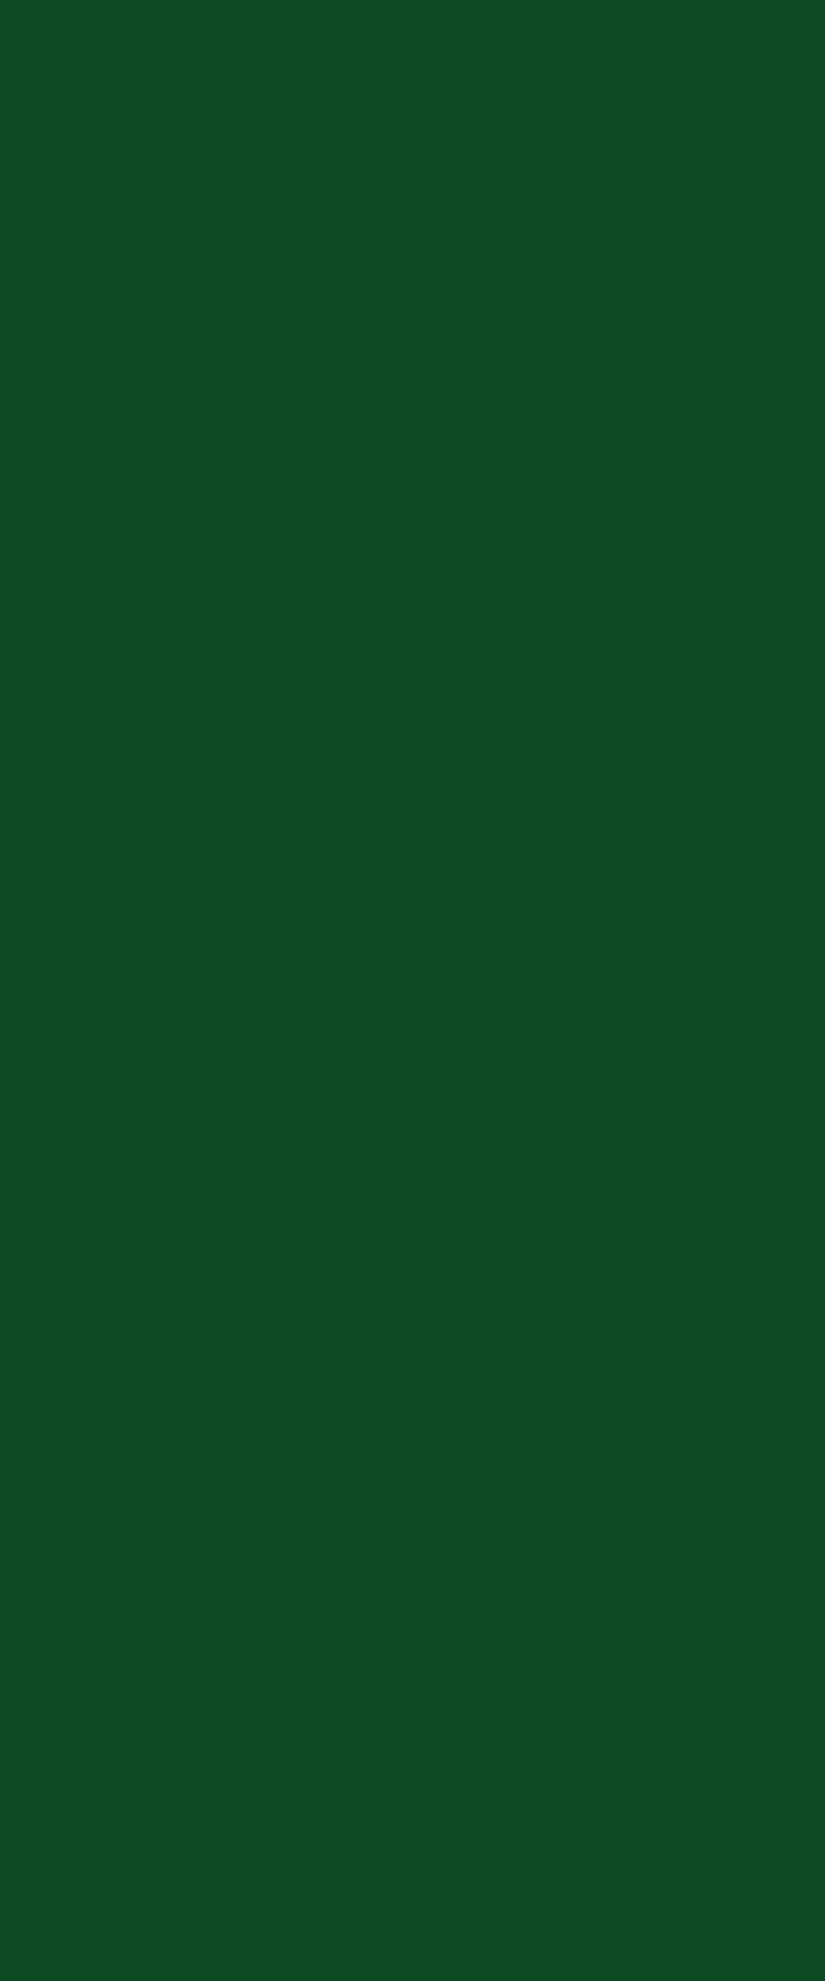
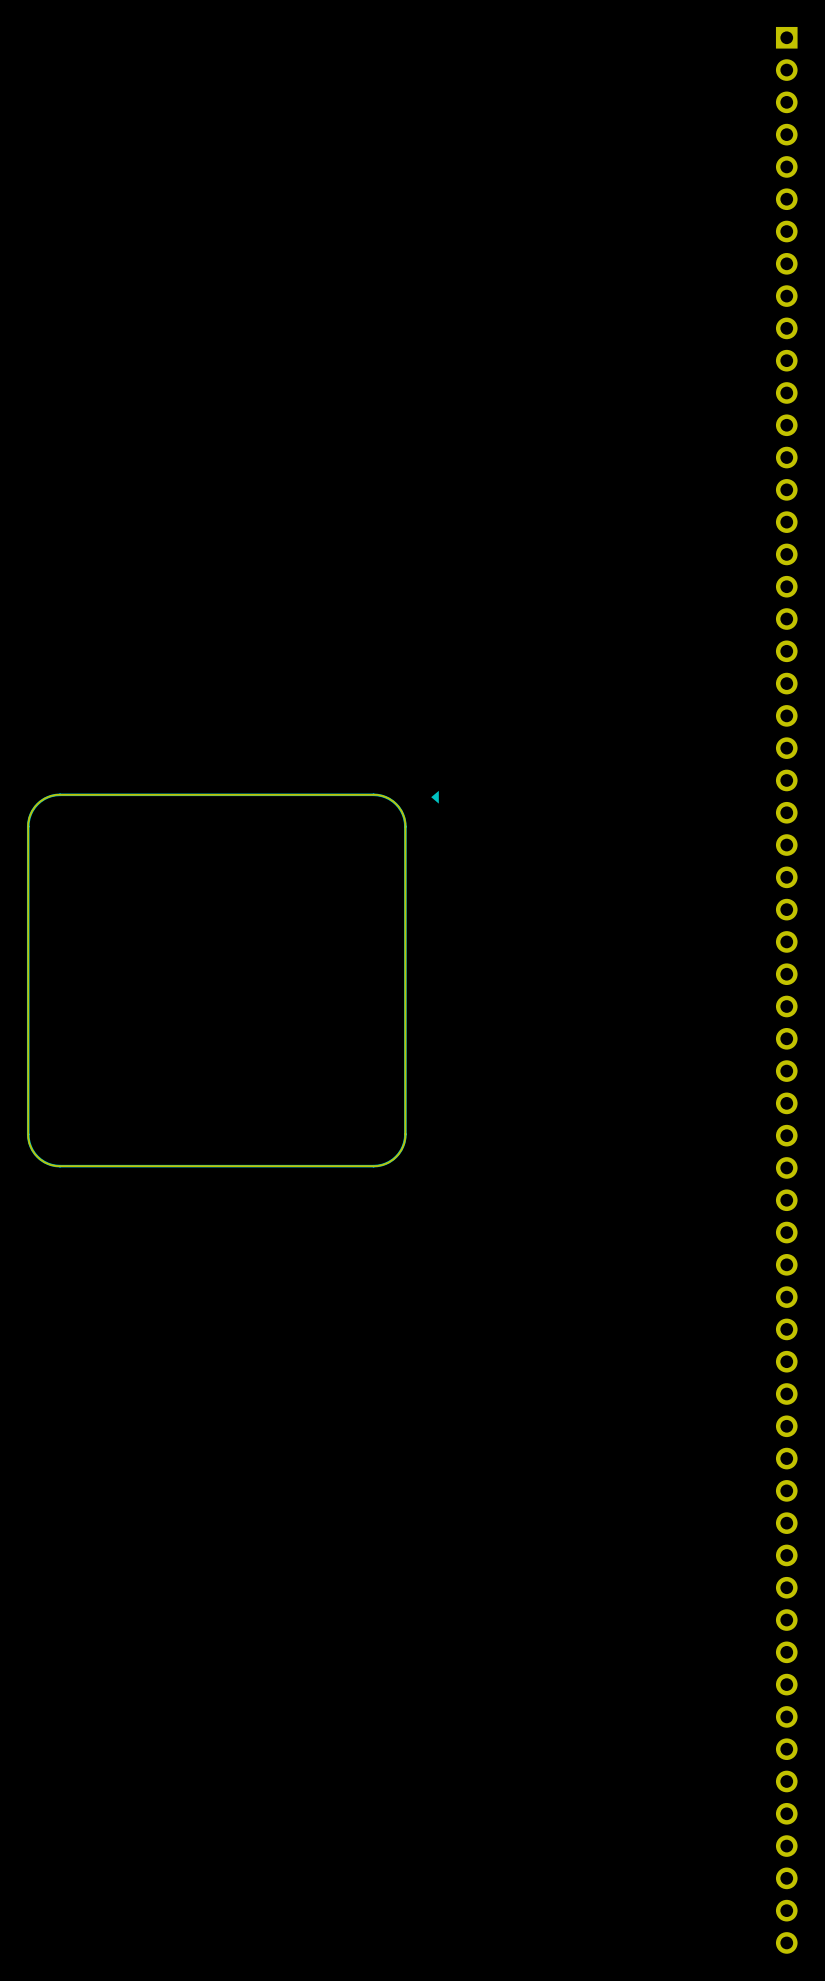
part: none -> (232, 979)
part: none -> (786, 990)

